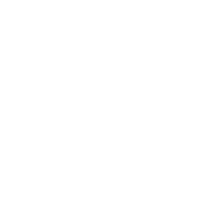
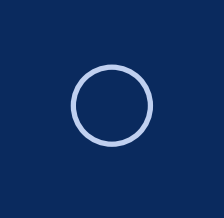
round board edge: none -> [70, 64, 154, 147]

